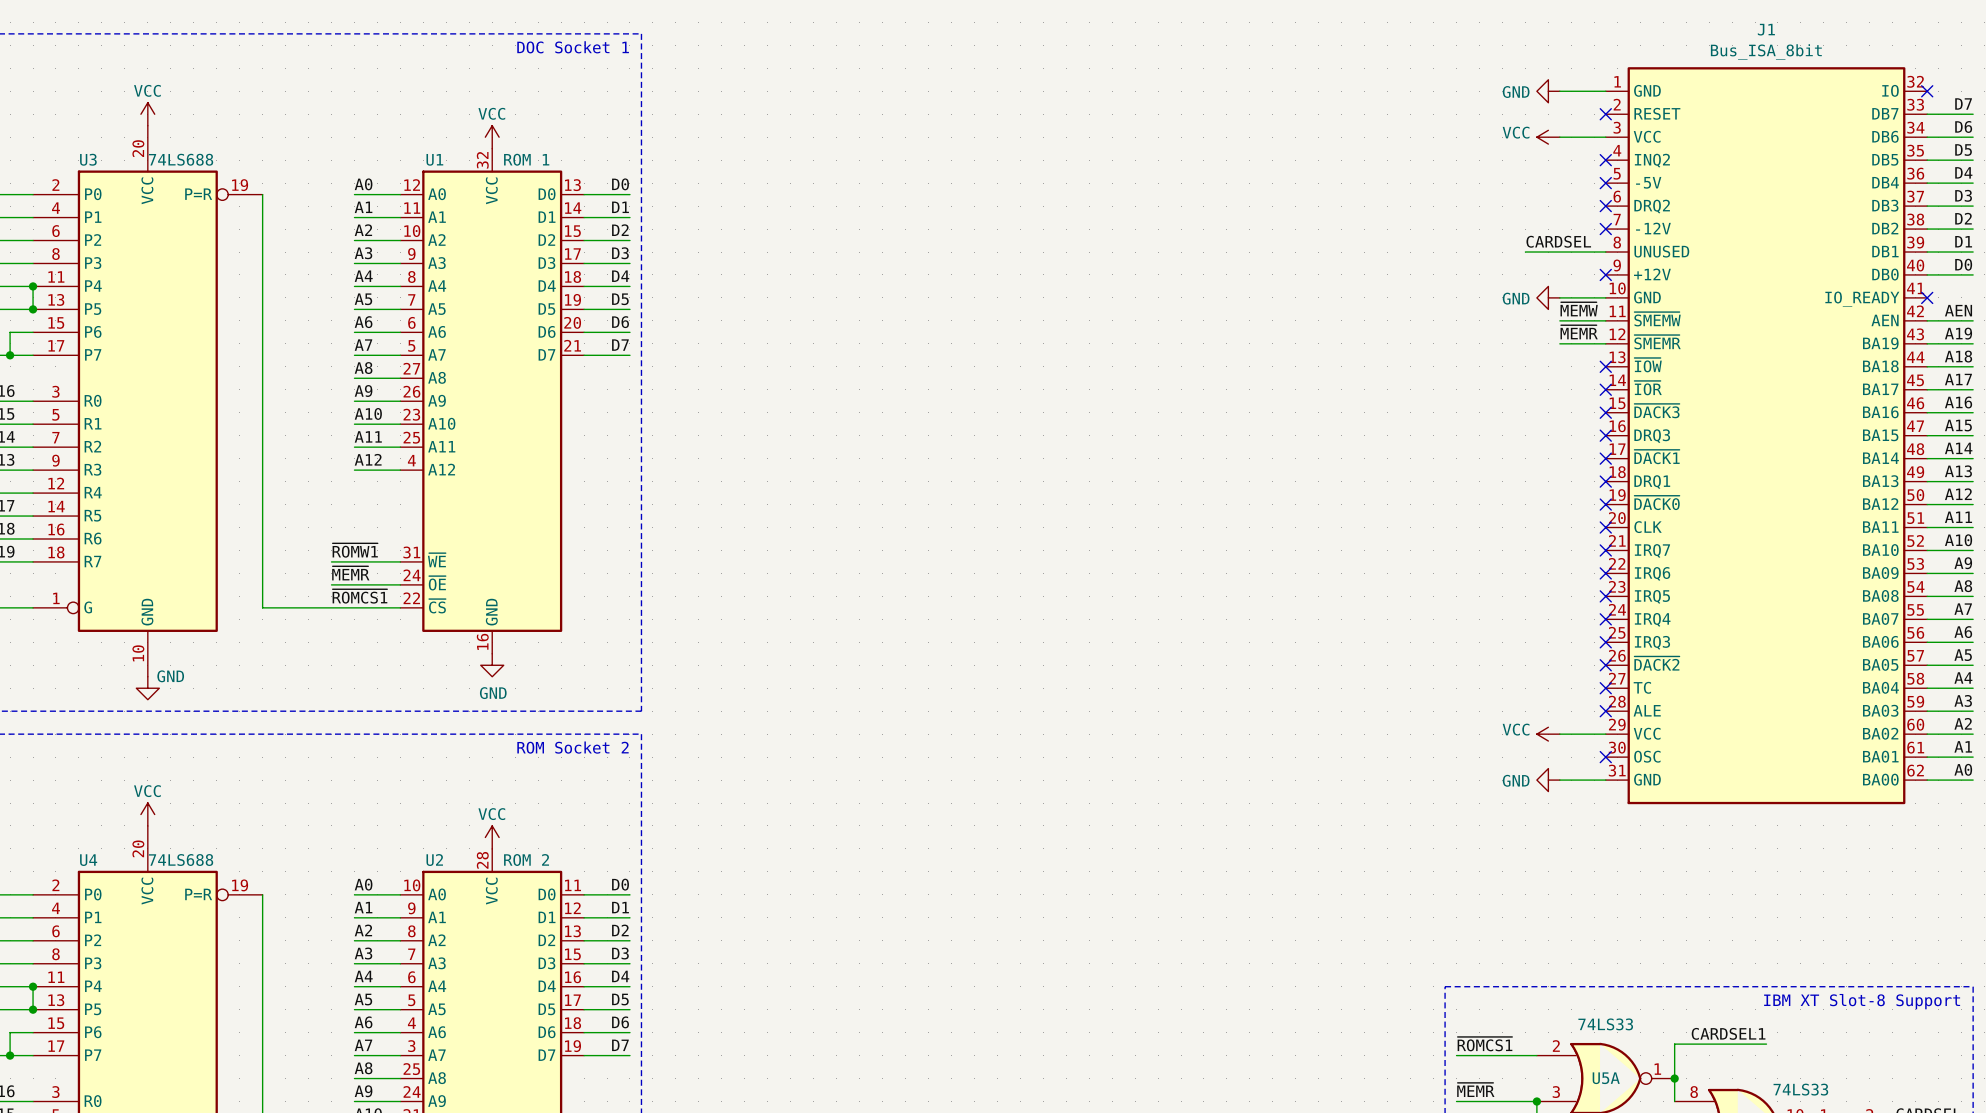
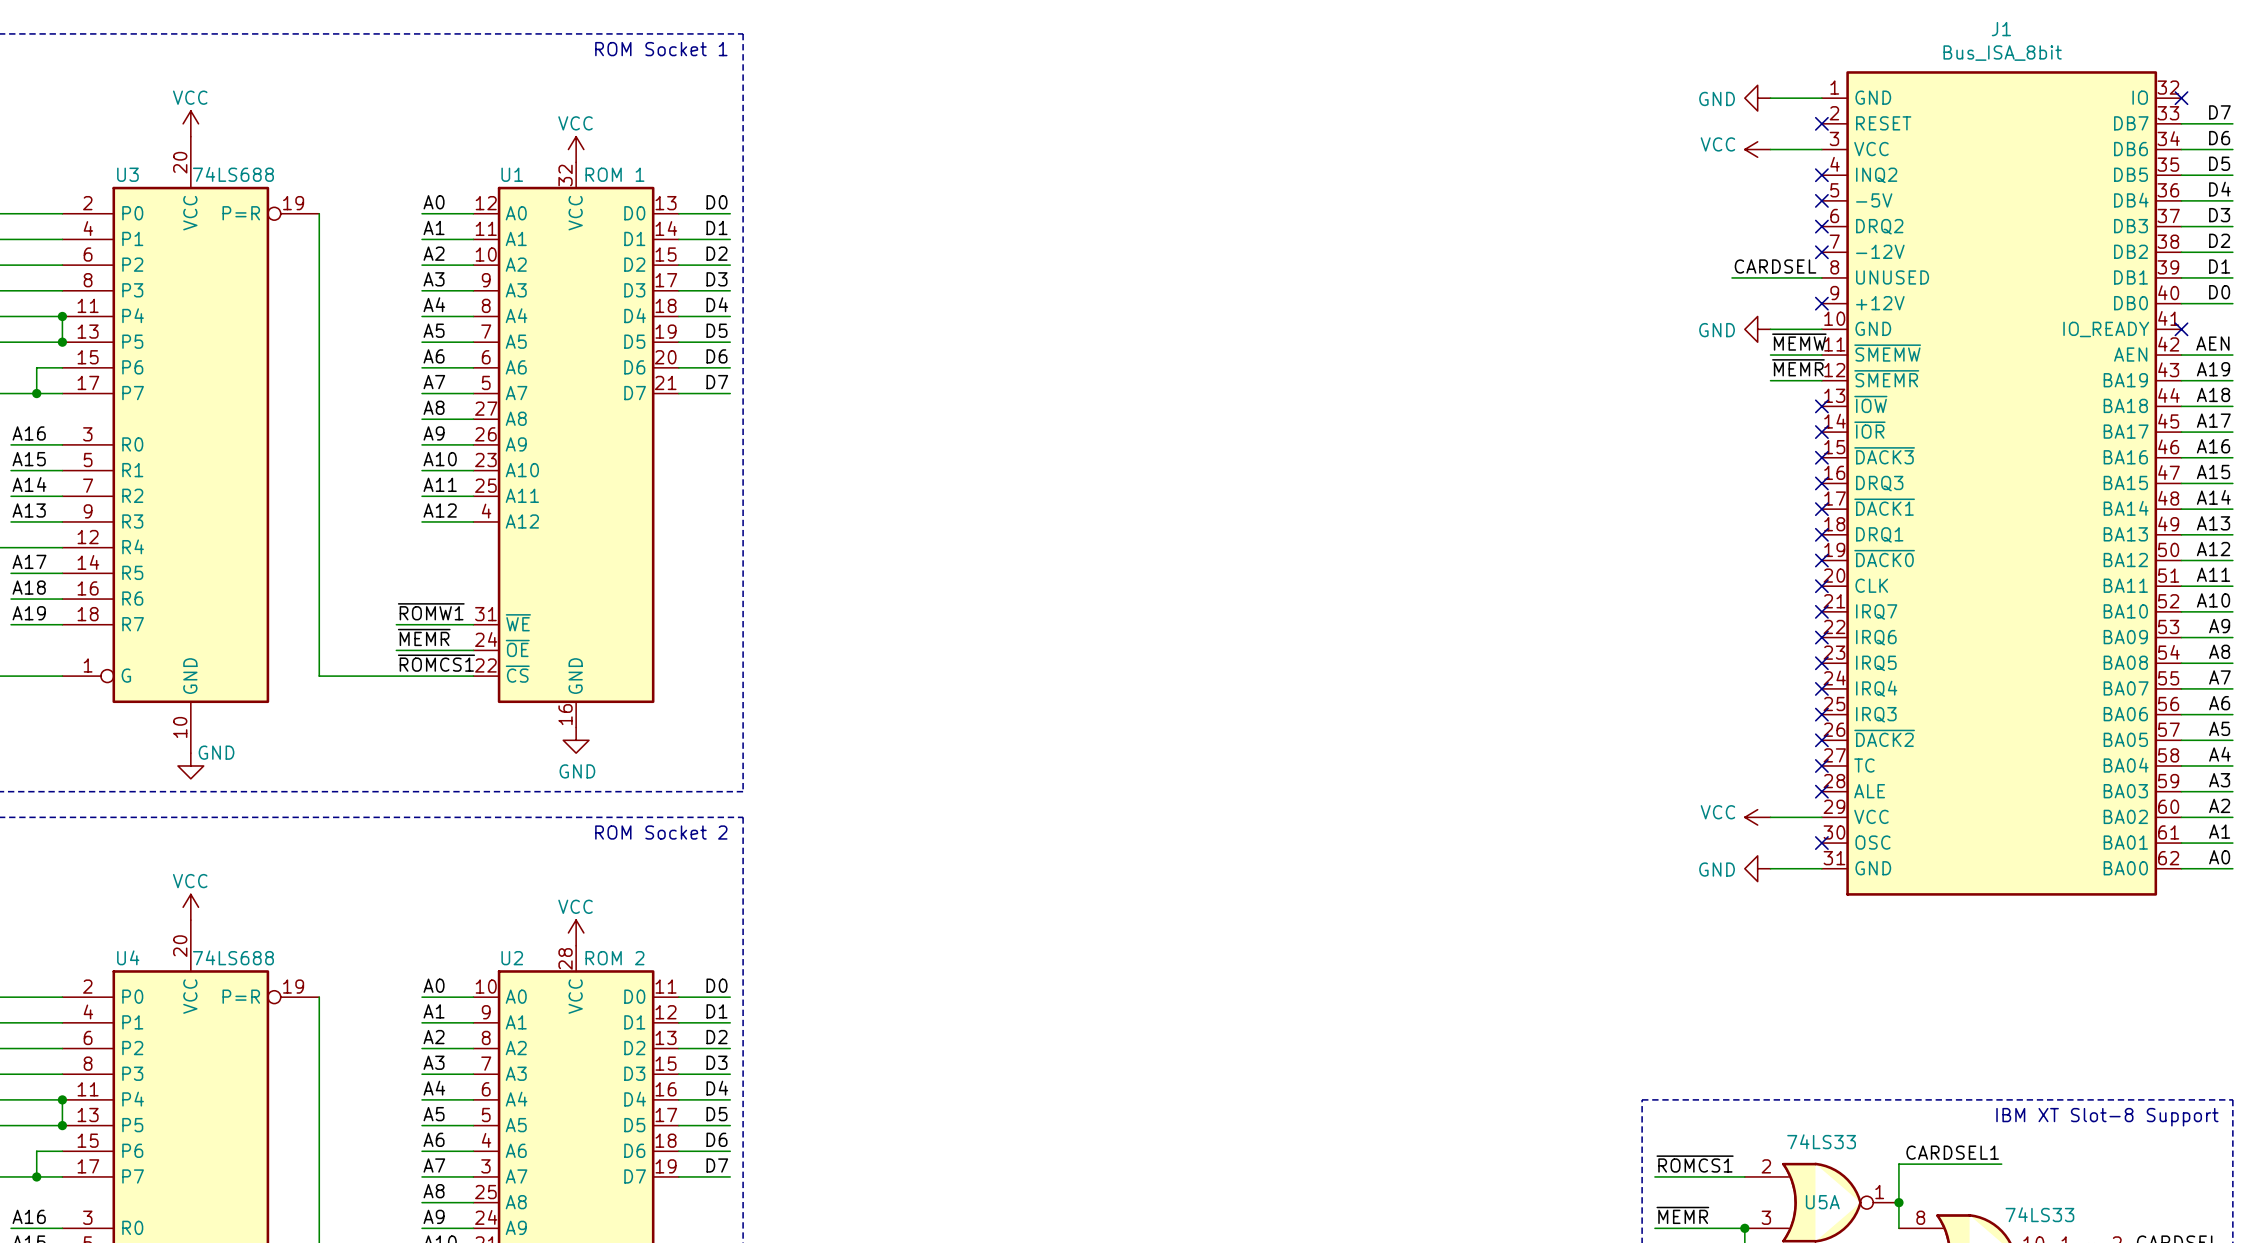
text: DOC Socket 1 (573, 47) -> ROM Socket 1 (661, 49)

